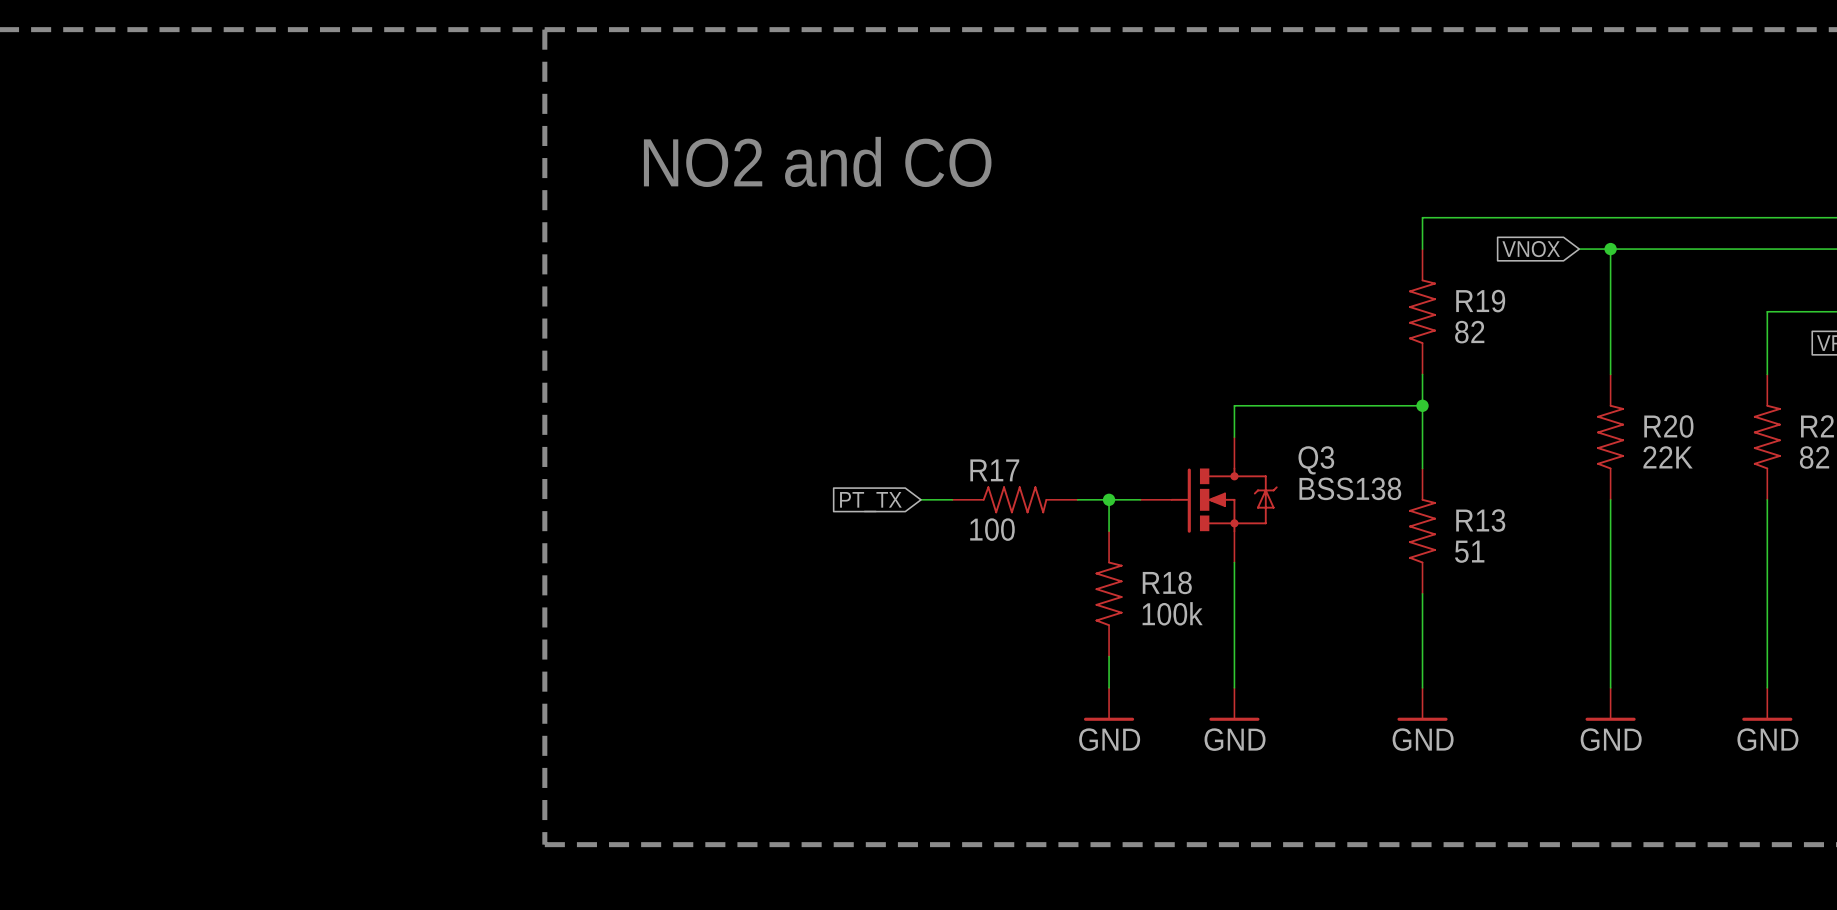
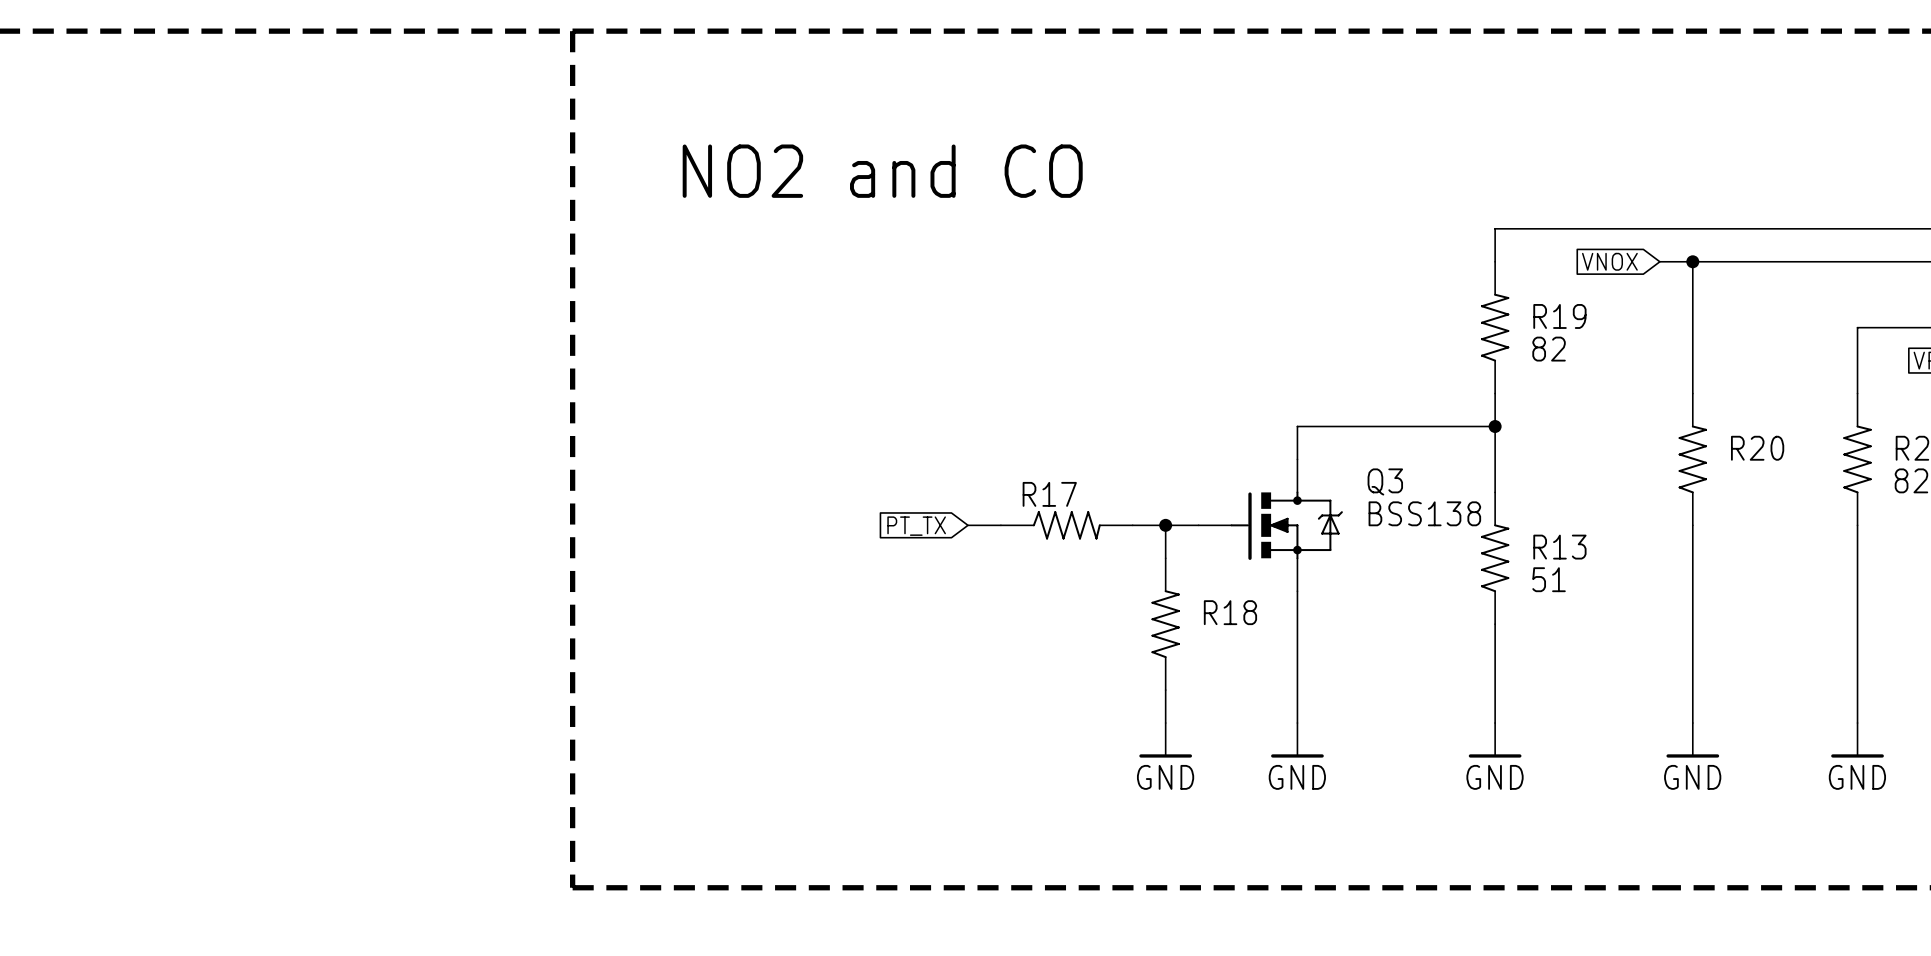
R20 value: 22K (1668, 457) -> none
R17 value: 100 (992, 529) -> none
R18 value: 100k (1172, 613) -> none

